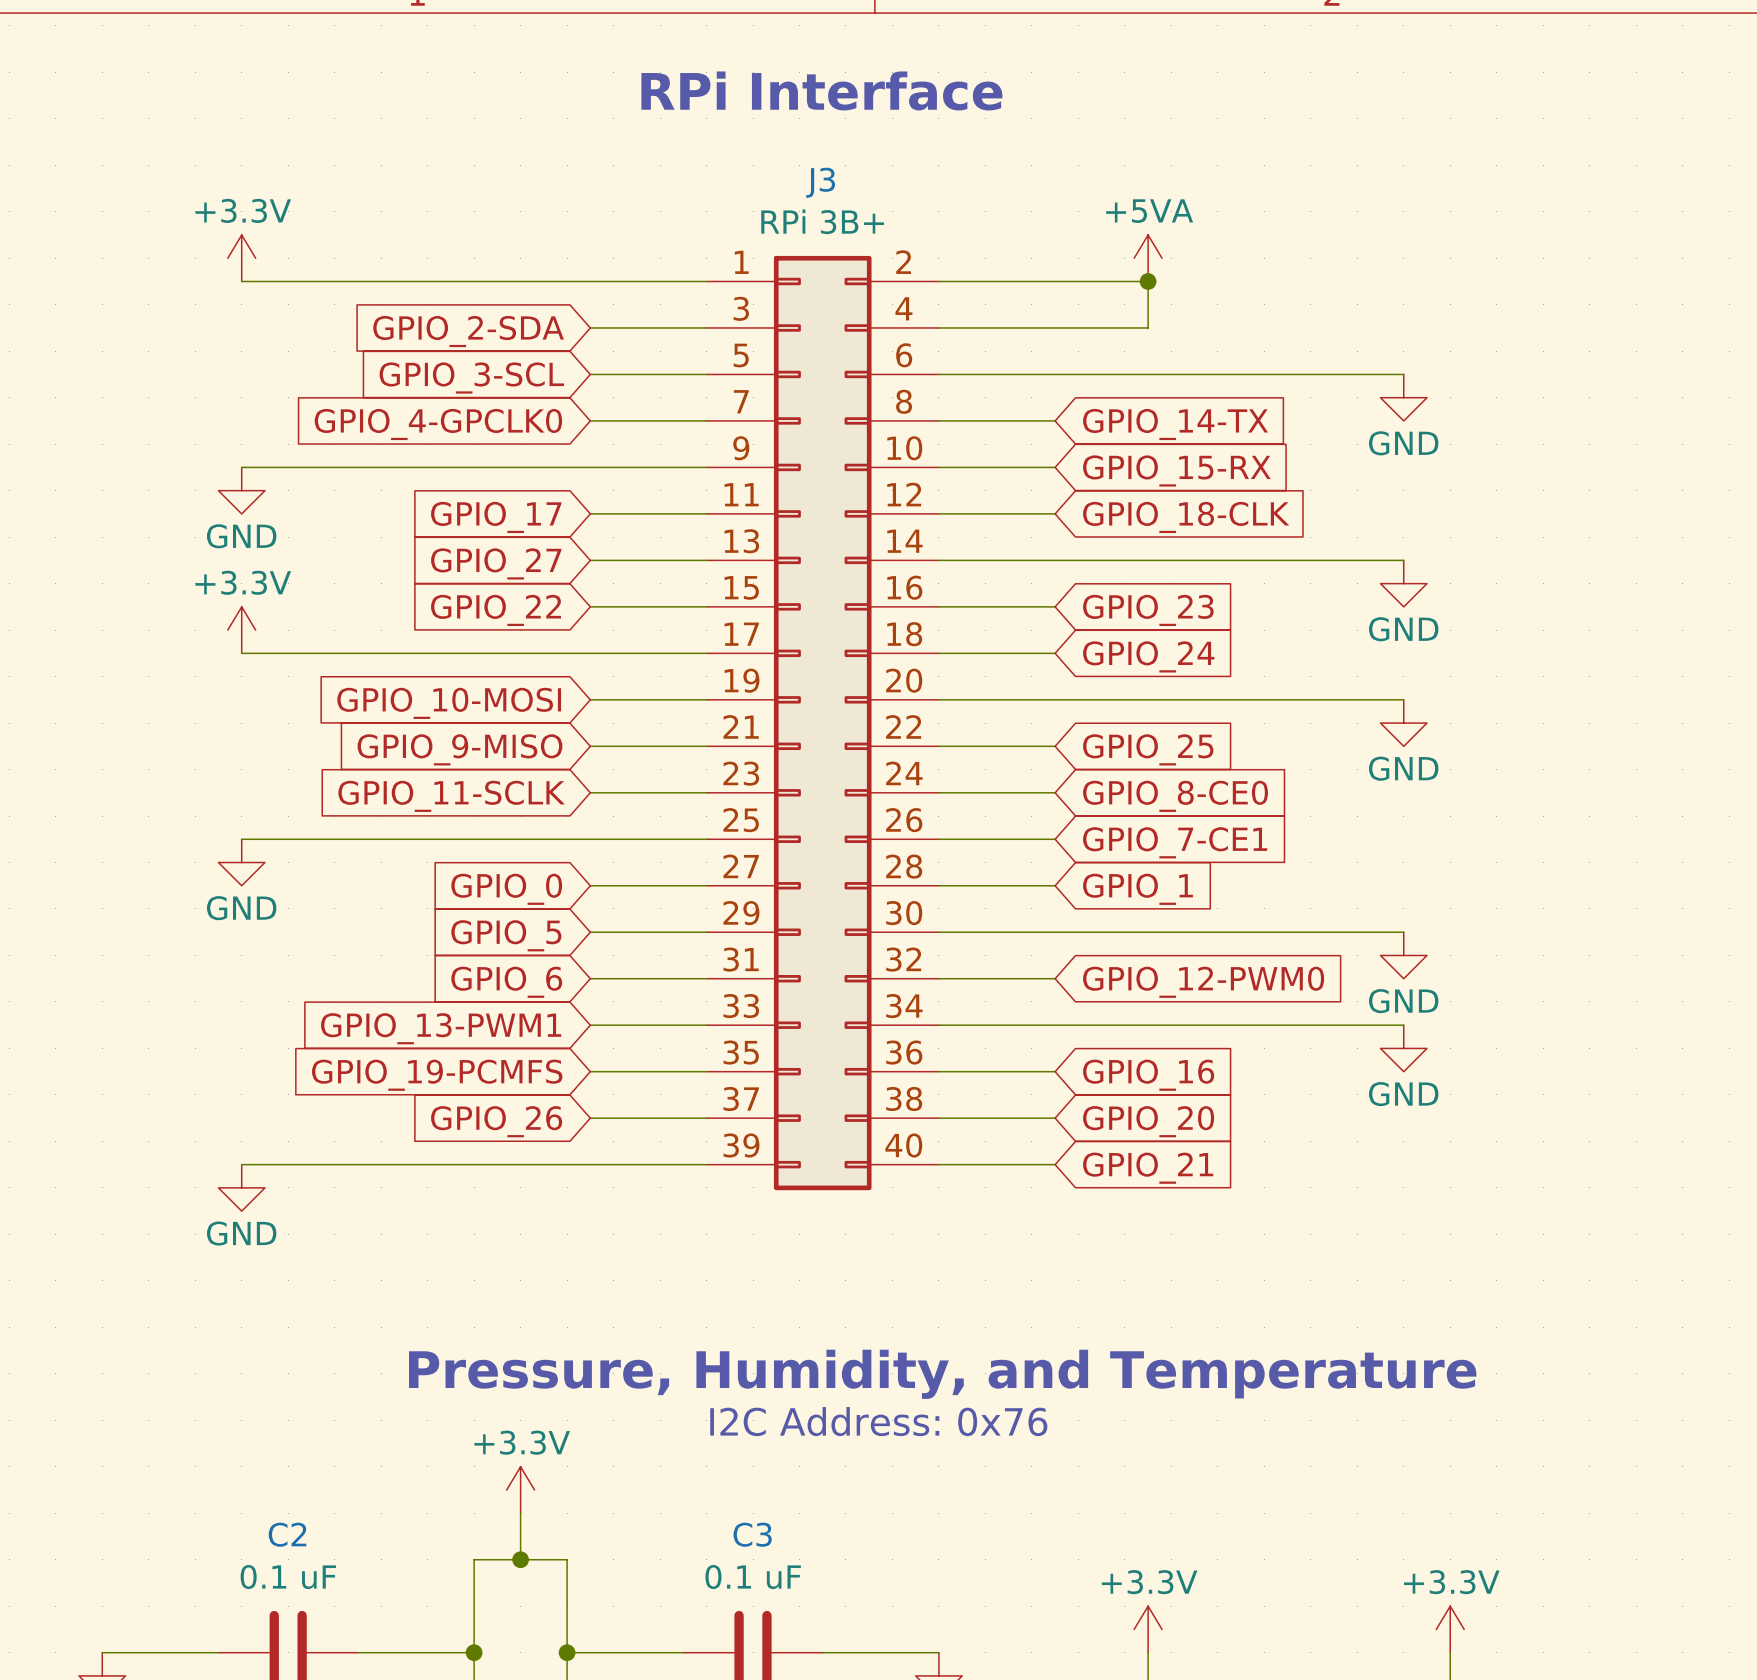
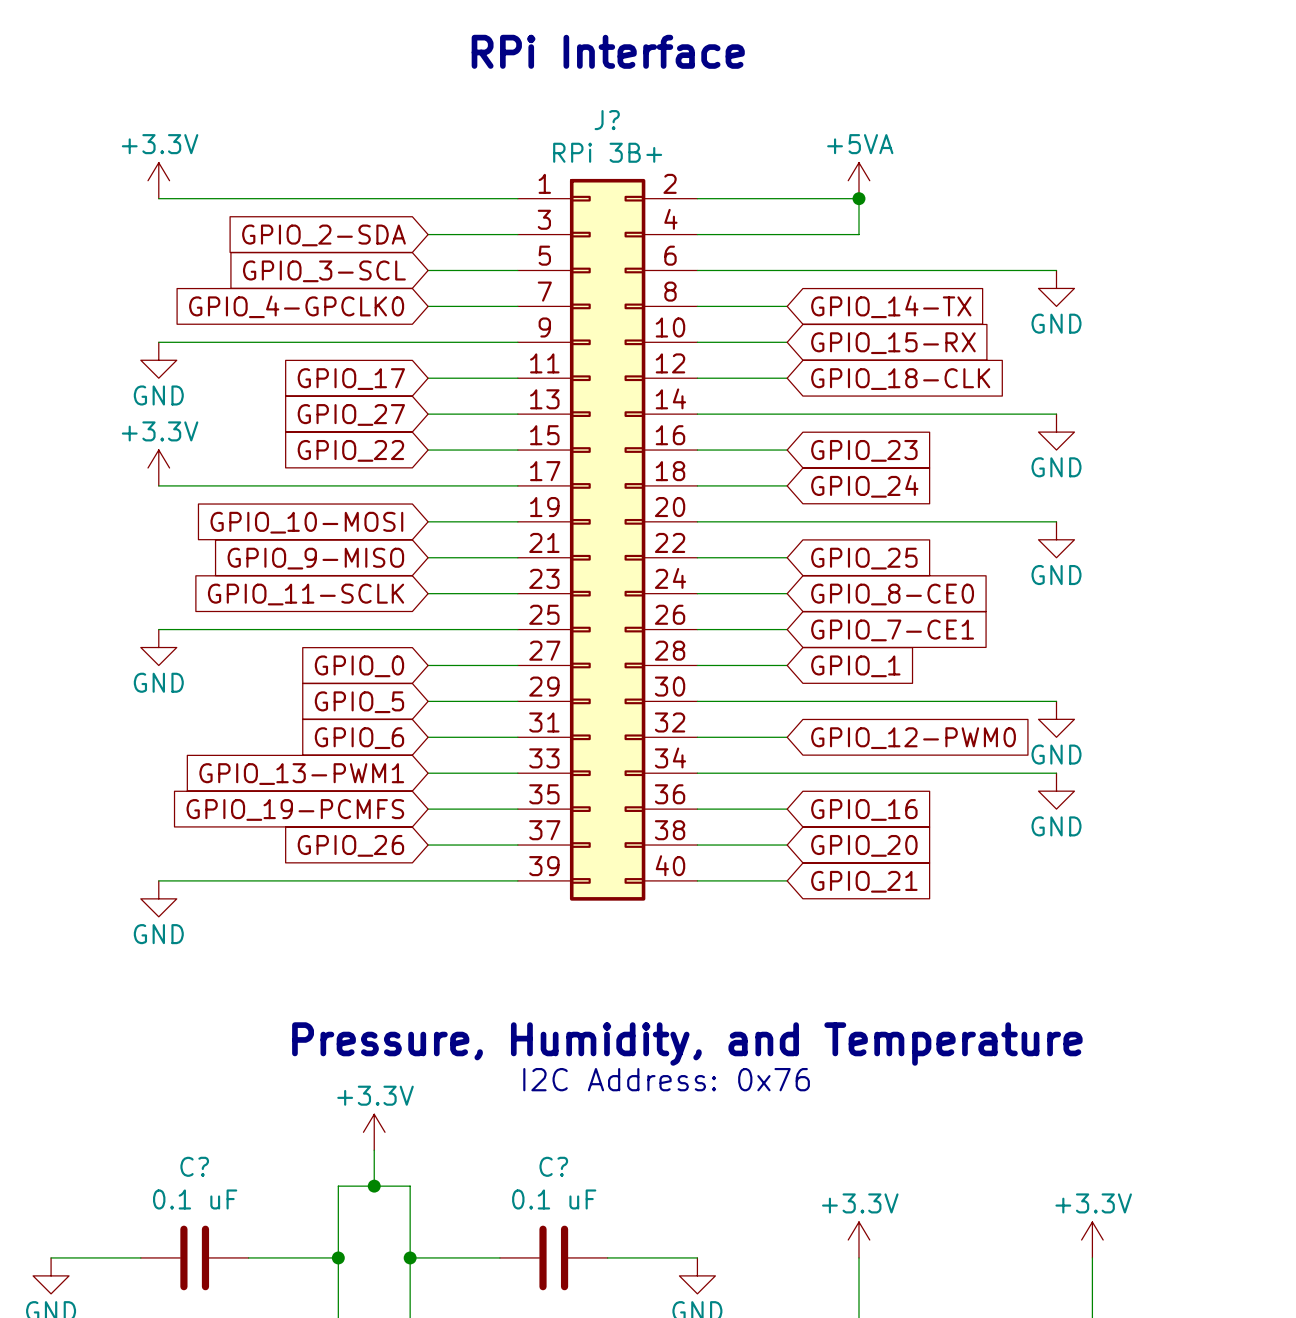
J3 name: J3 (820, 182) -> J? (607, 120)
C2 name: C2 (287, 1534) -> C? (194, 1166)
C3 name: C3 (752, 1534) -> C? (553, 1166)

